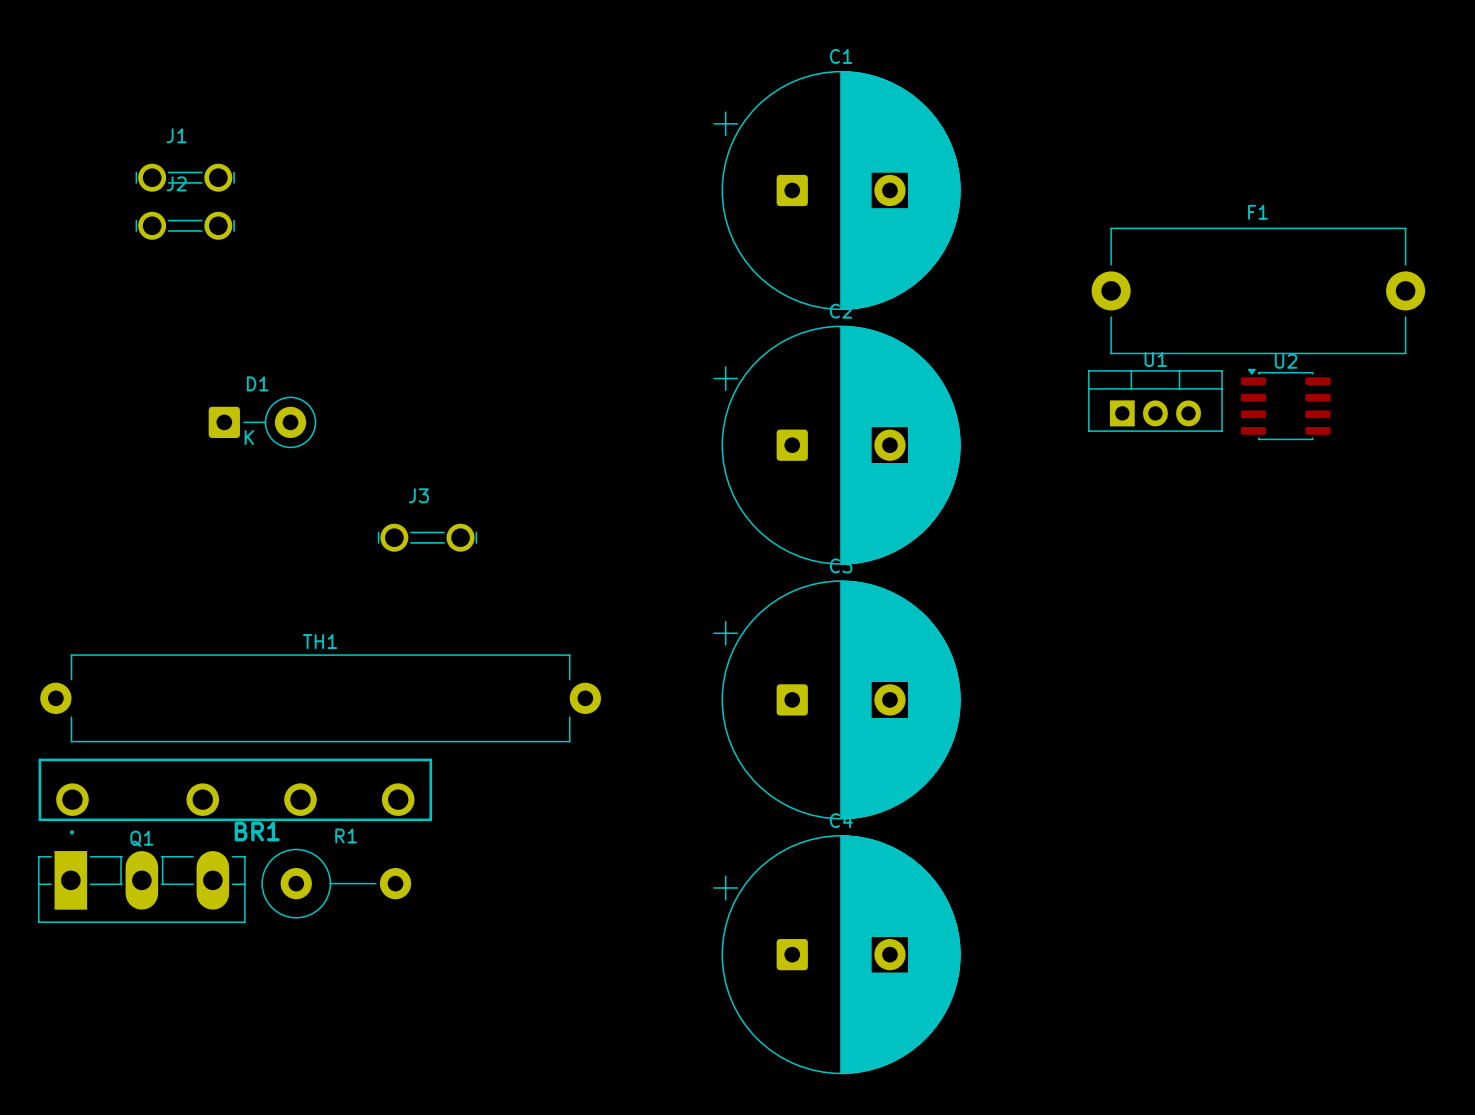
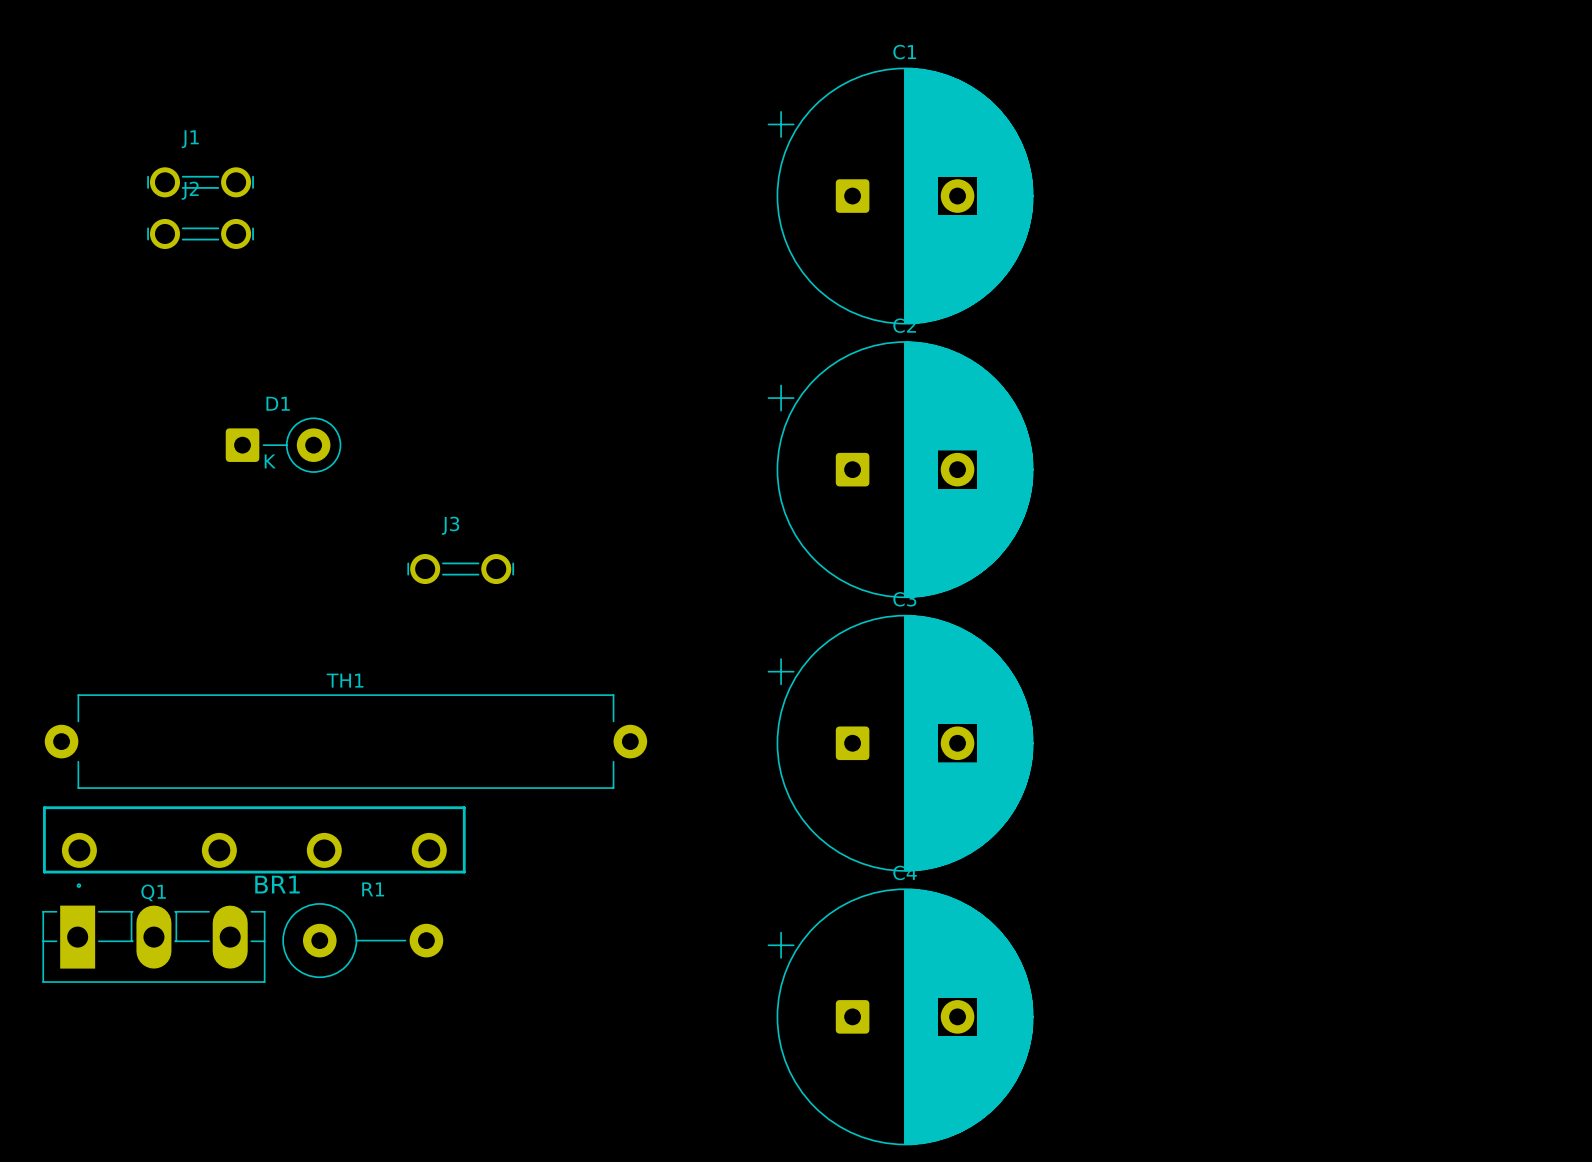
F1: (1258, 290) -> none
U1: (1155, 401) -> none
U2: (1285, 404) -> none

